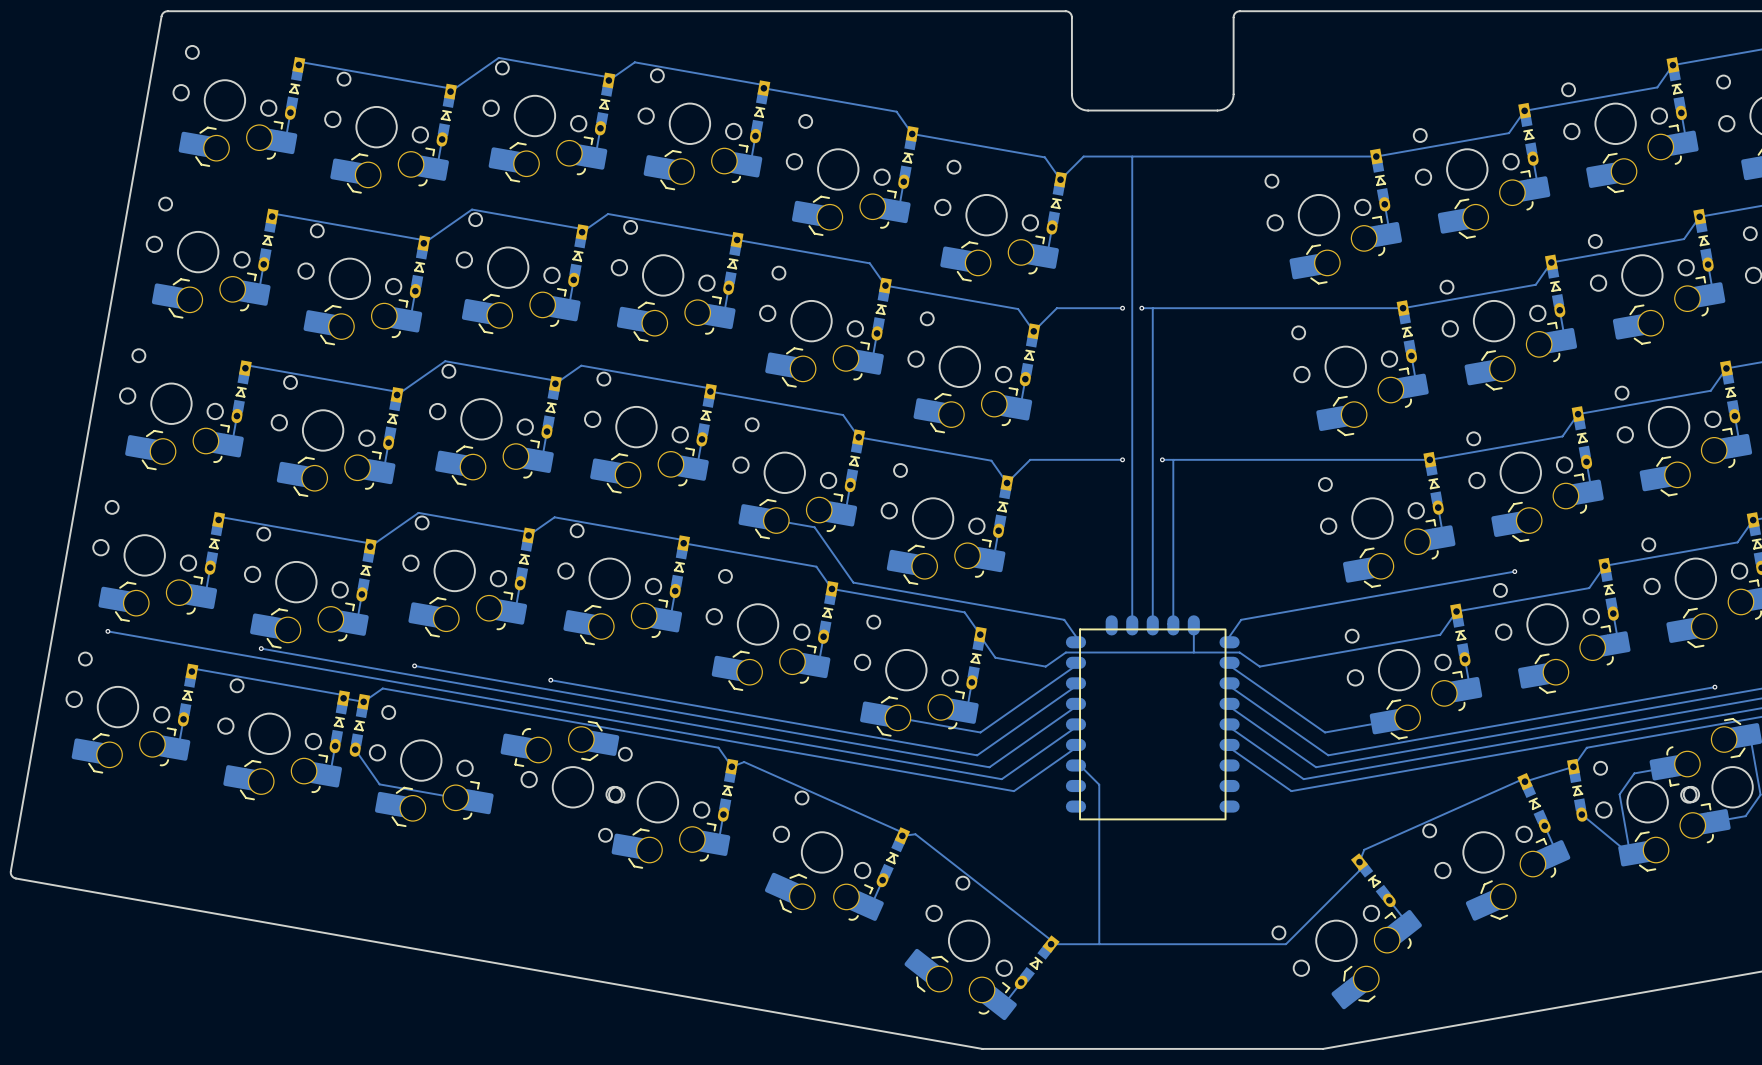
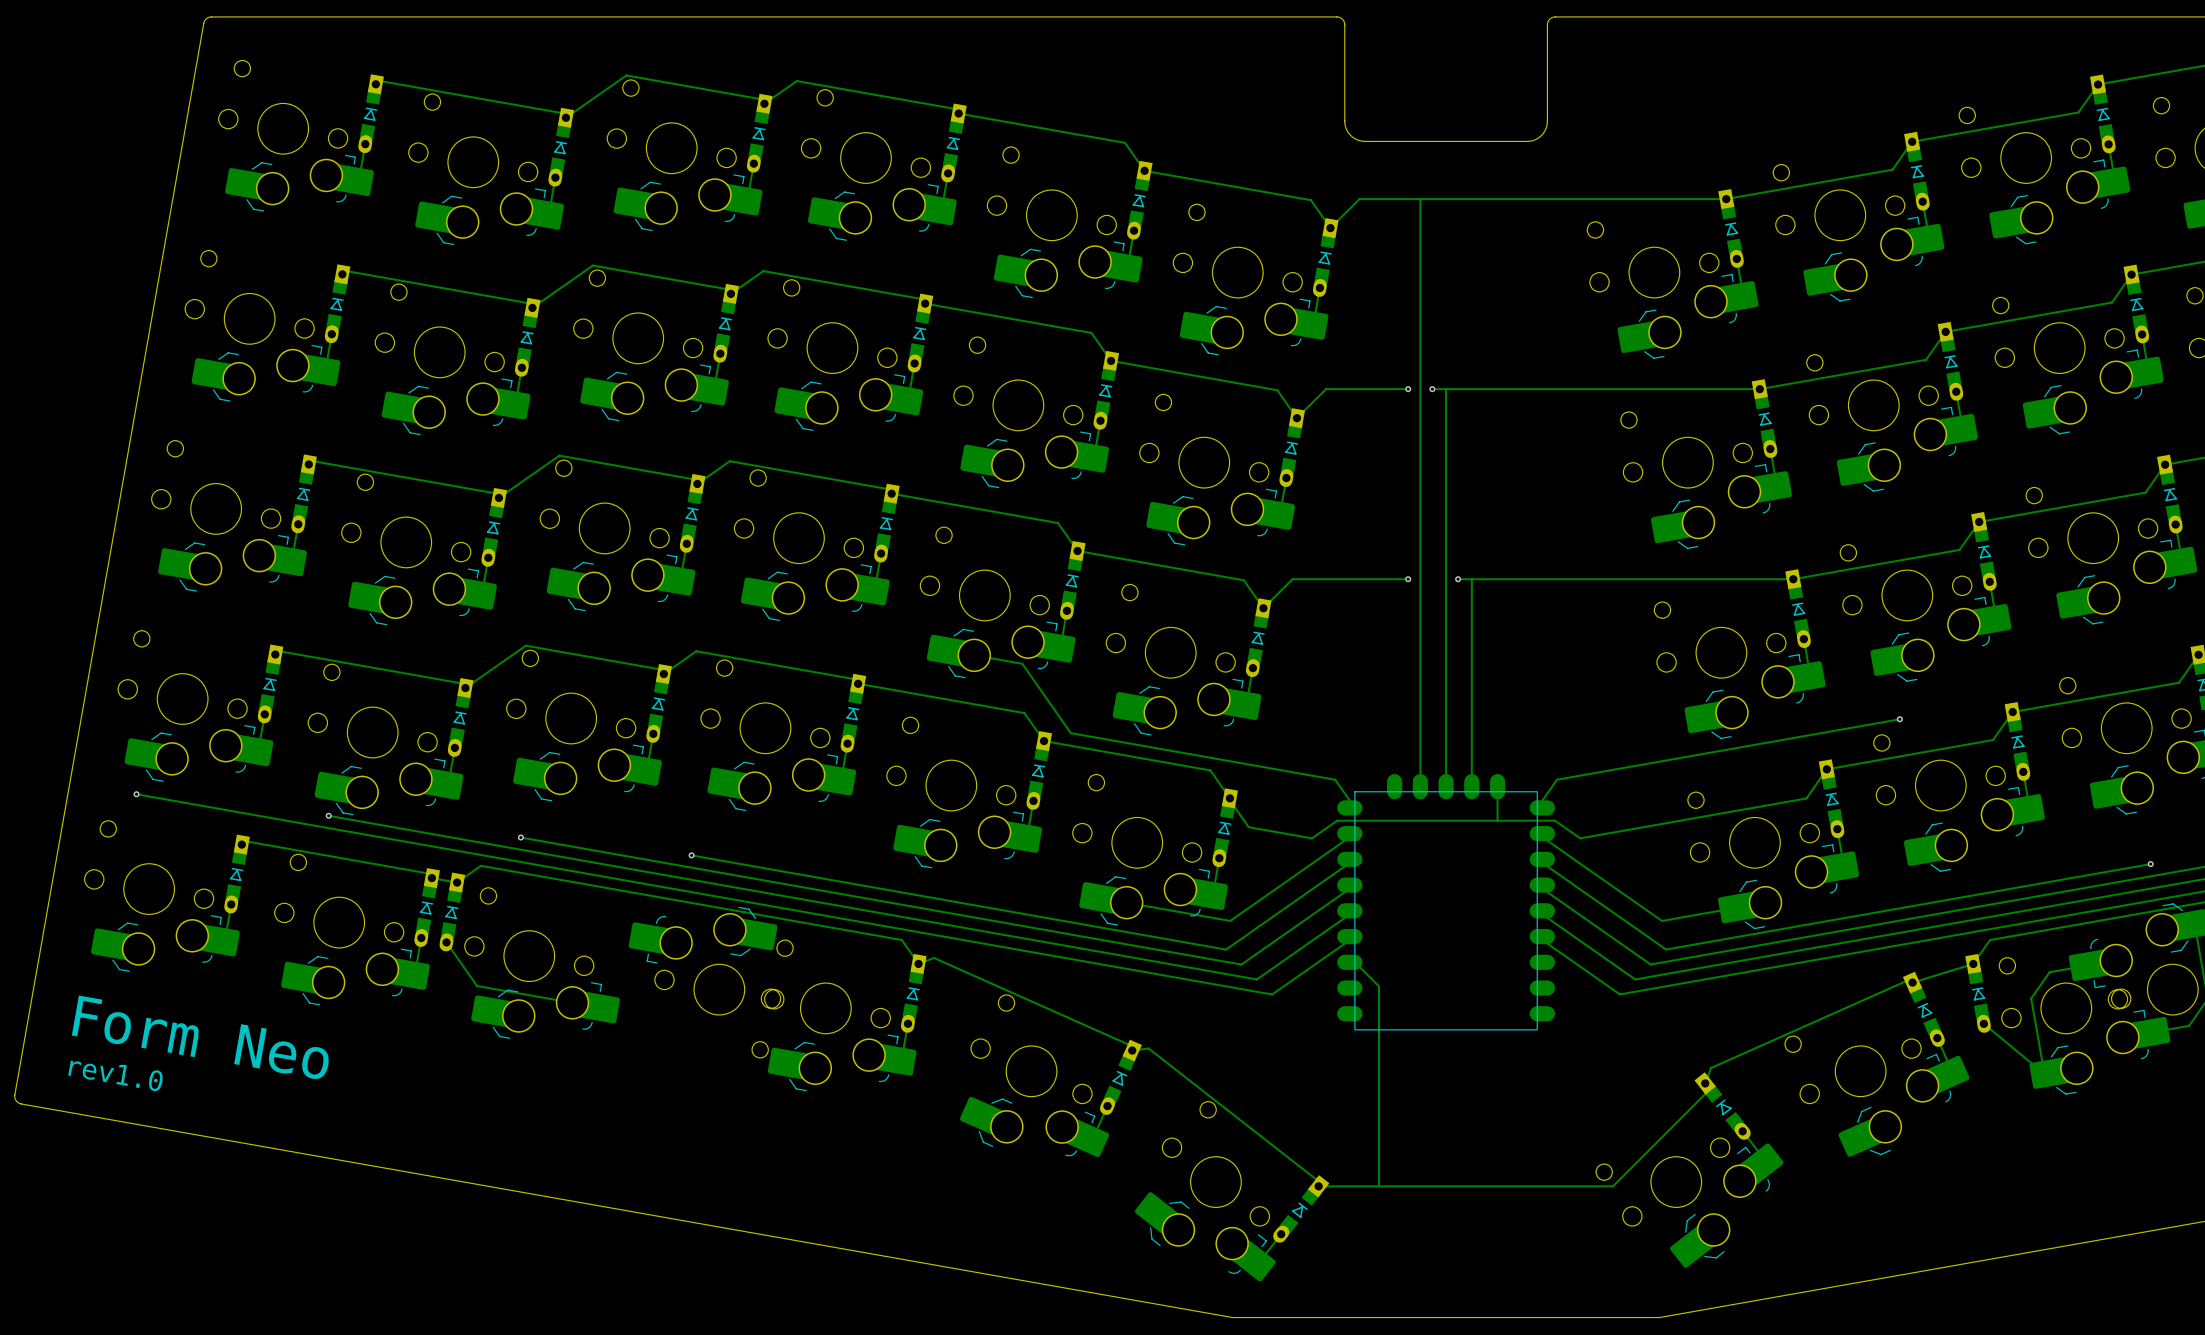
text: none -> Form Neo (200, 1037)
text: none -> rev1.0 (115, 1076)

